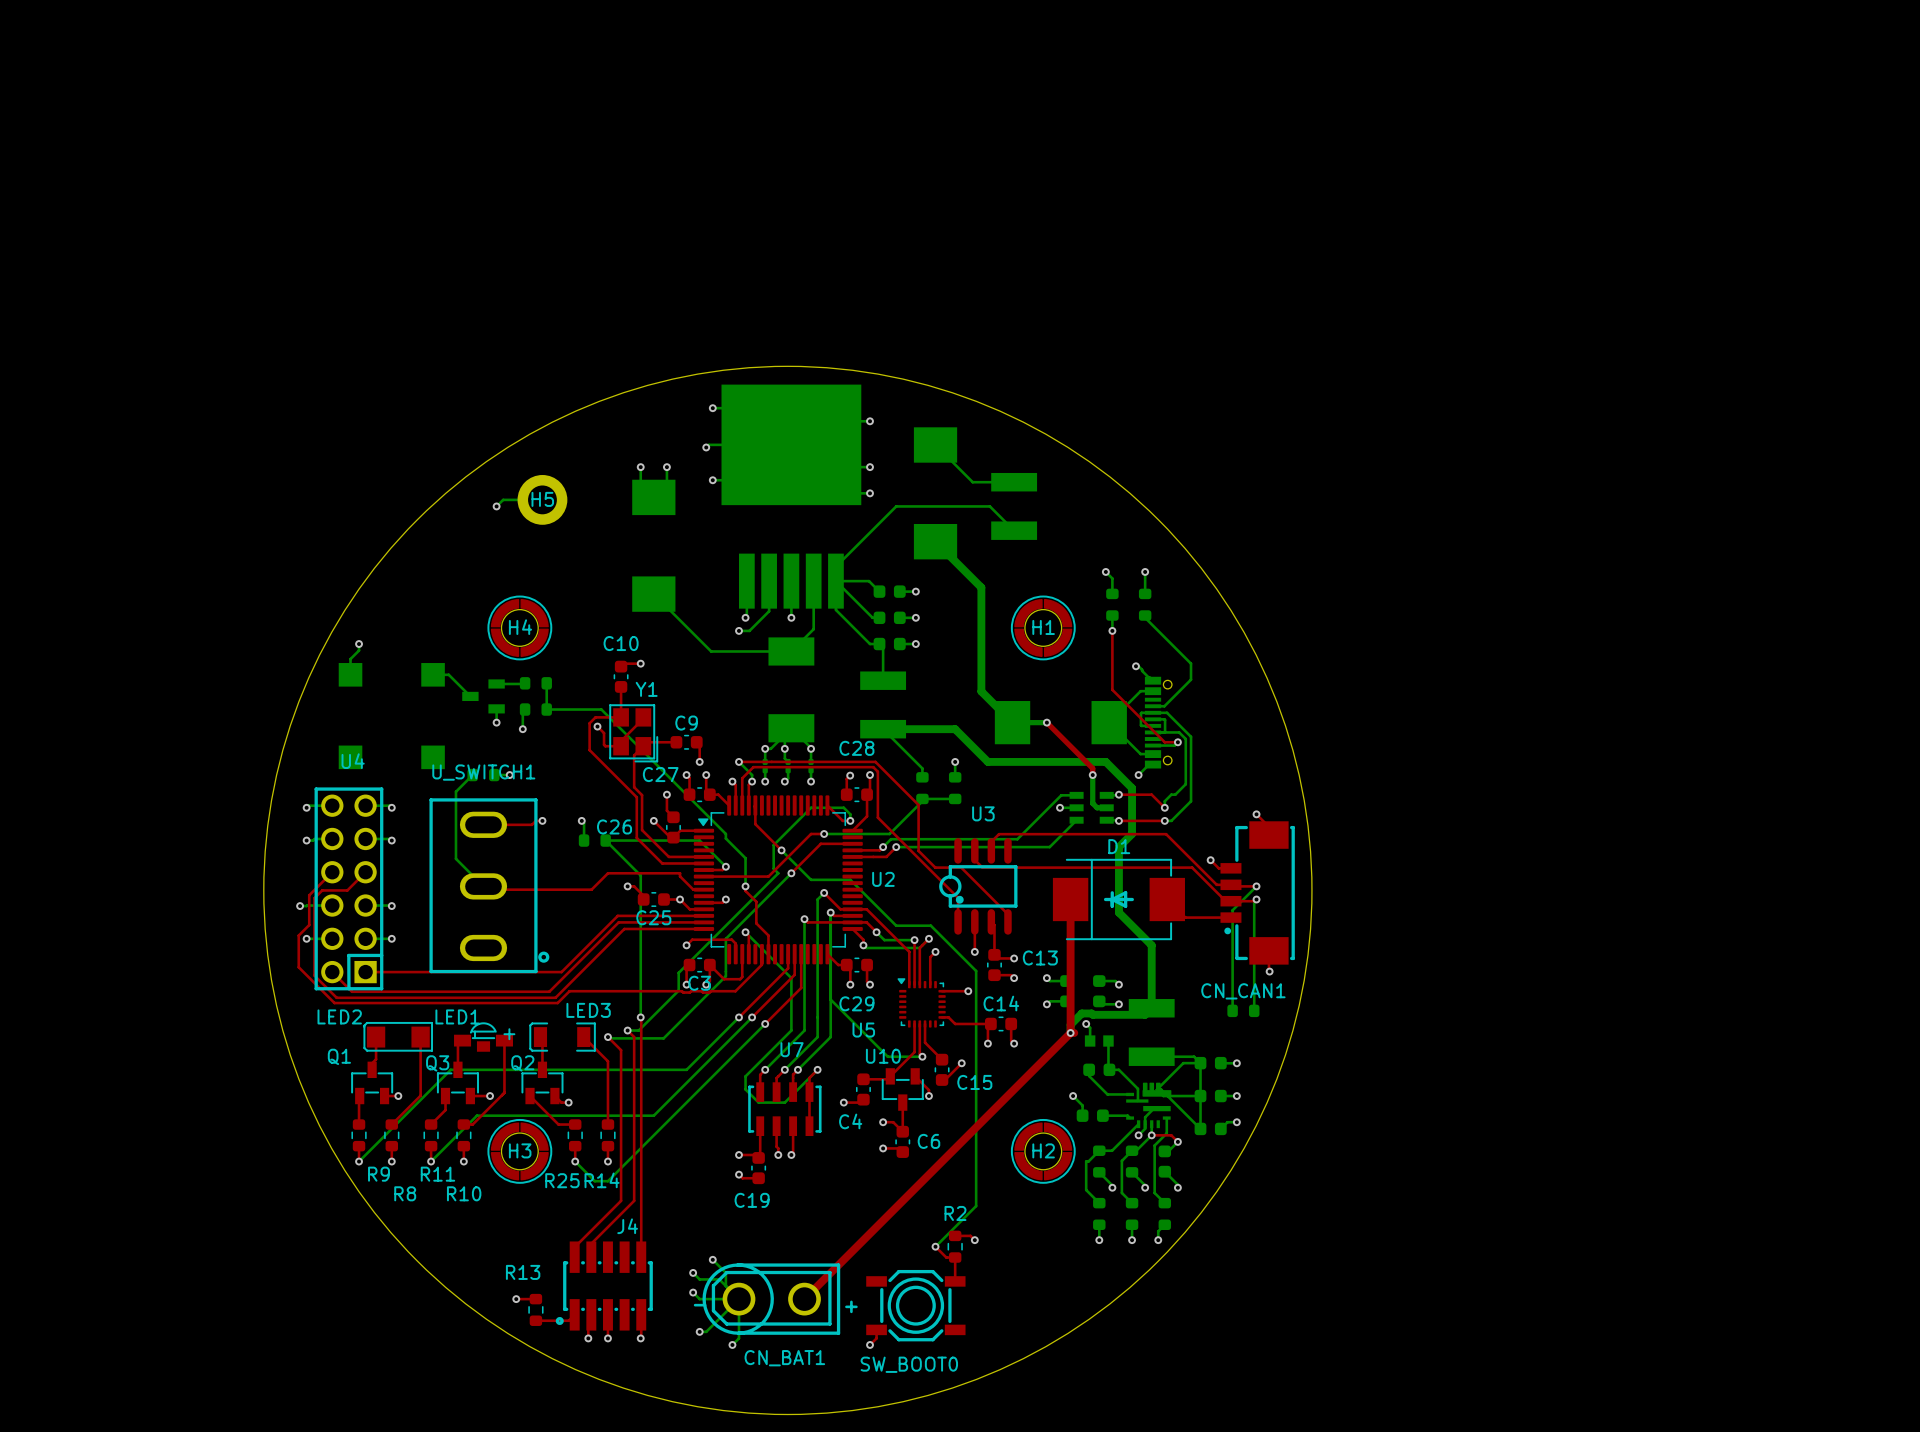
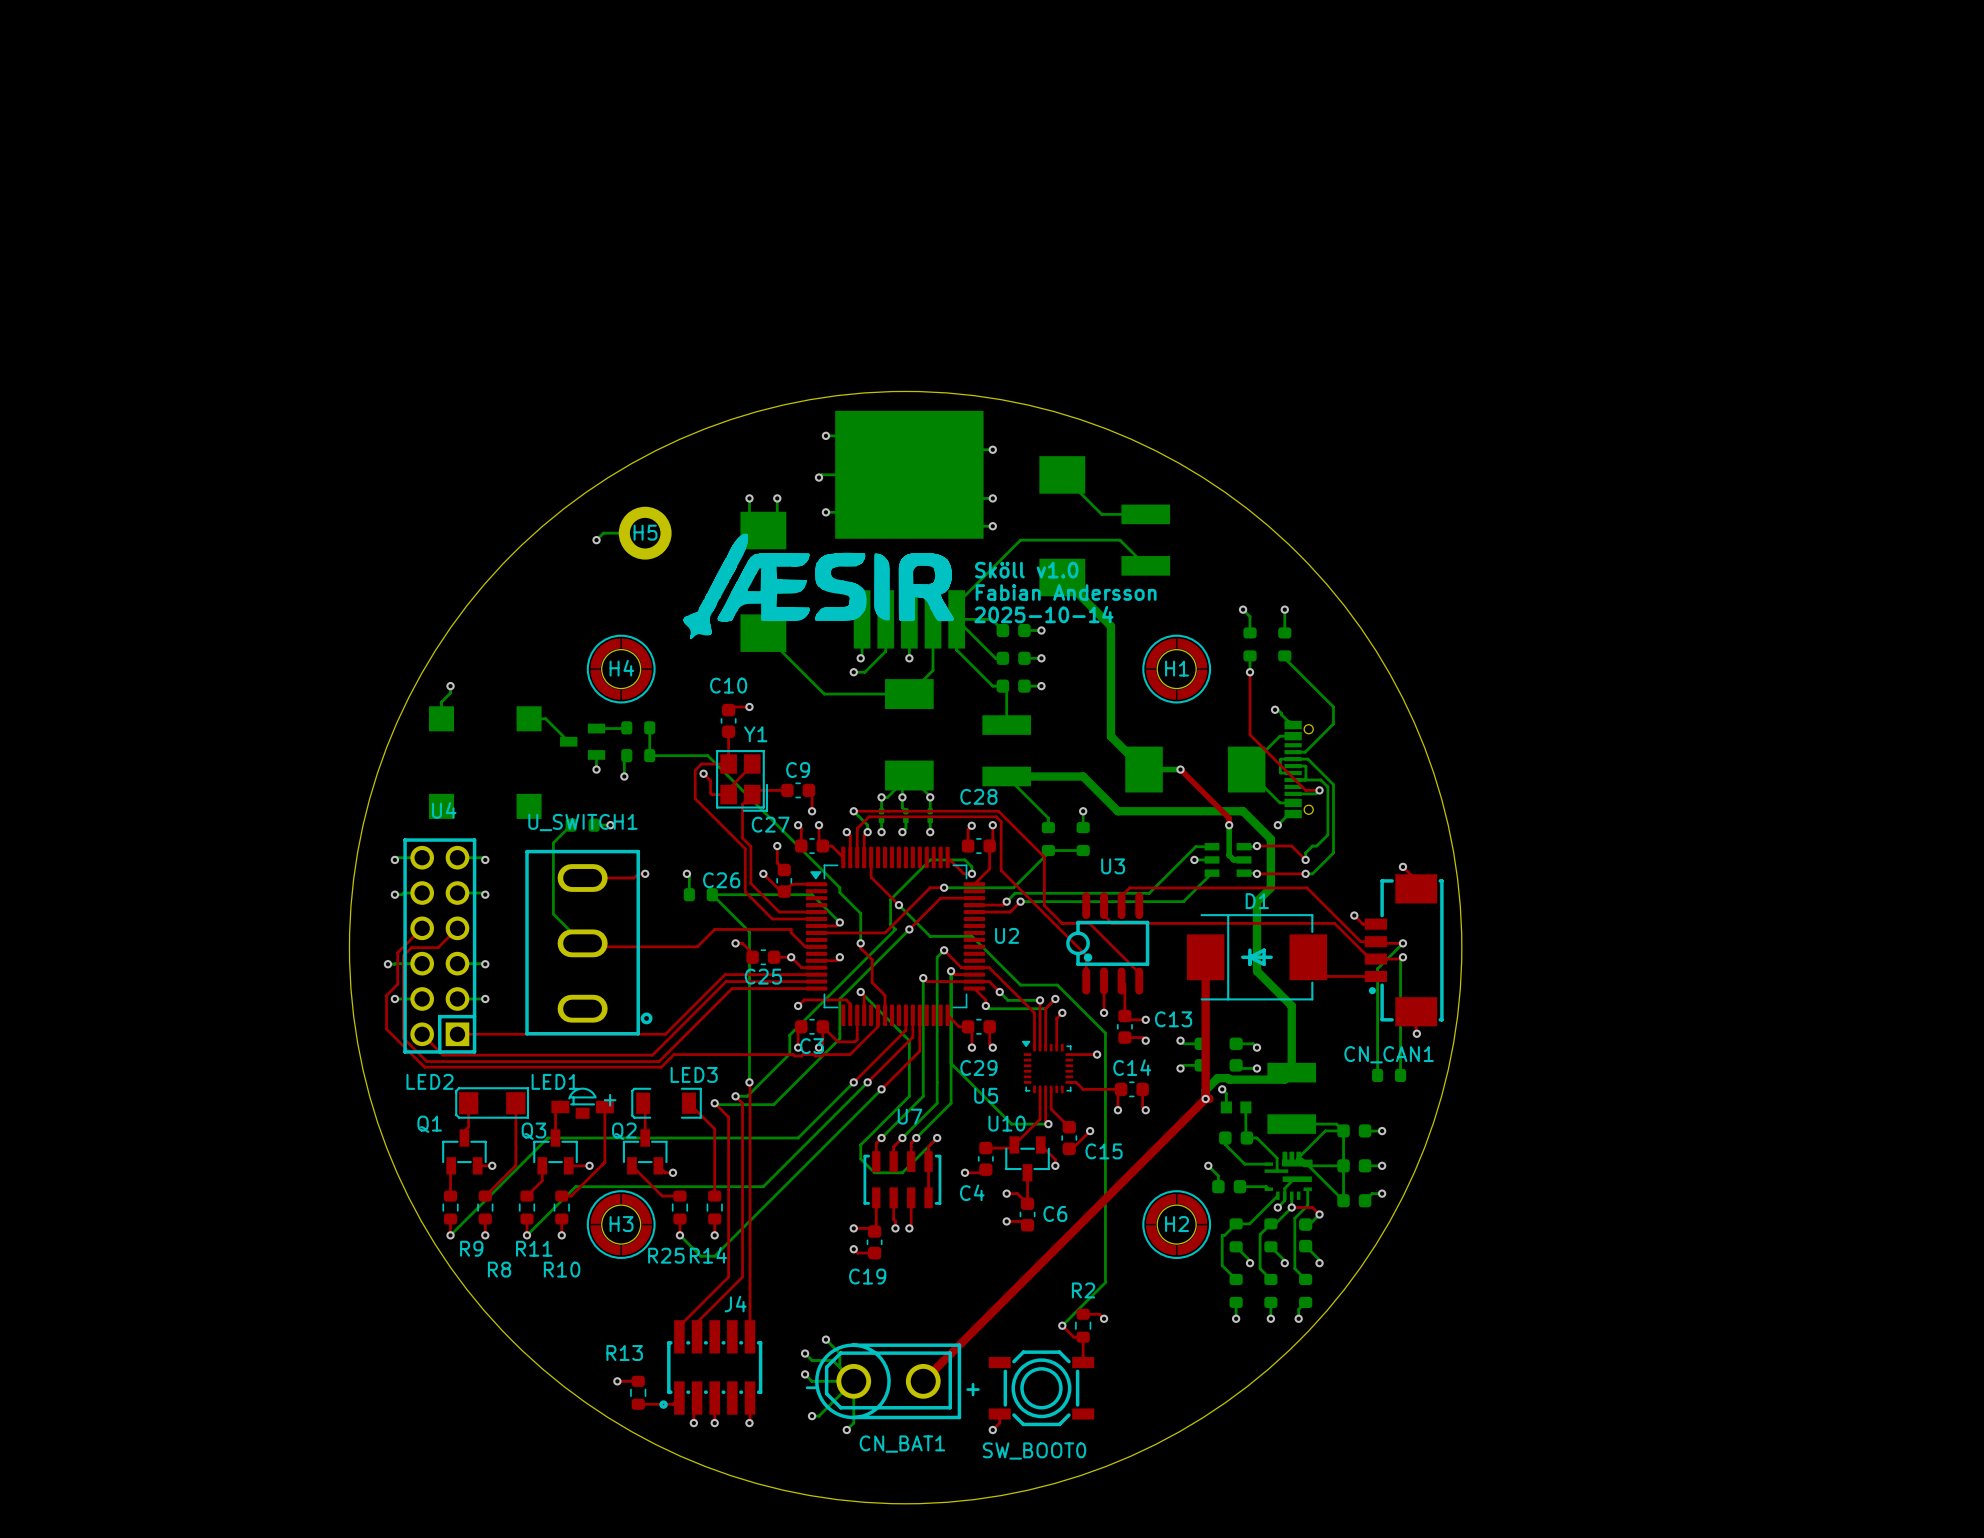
drawing: none -> [683, 533, 954, 640]
text: none -> Sköll v1.0 (1026, 570)
text: none -> Fabian Andersson (1066, 592)
text: none -> 2025-10-14 (1043, 614)

